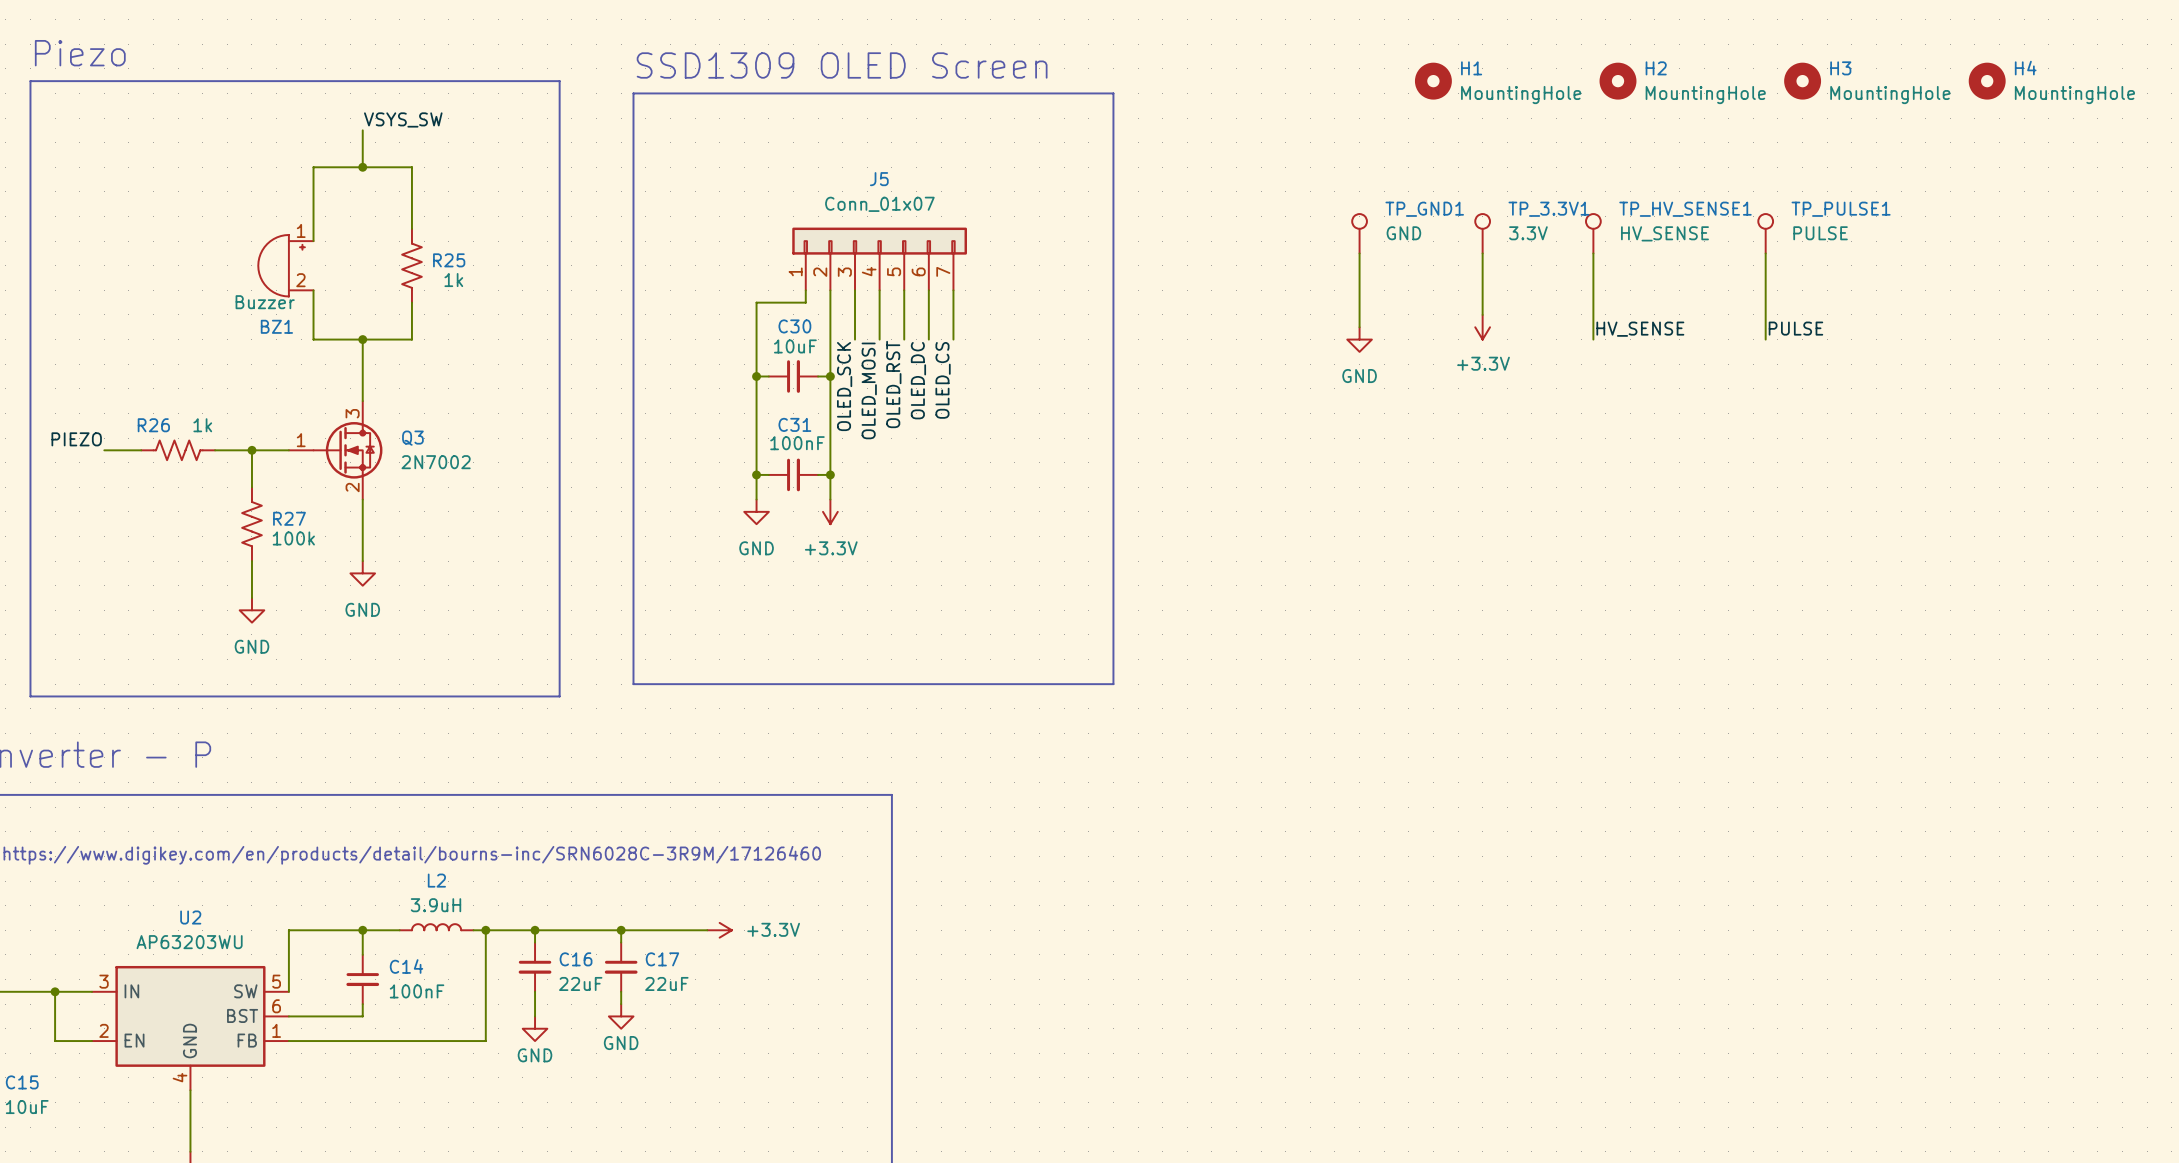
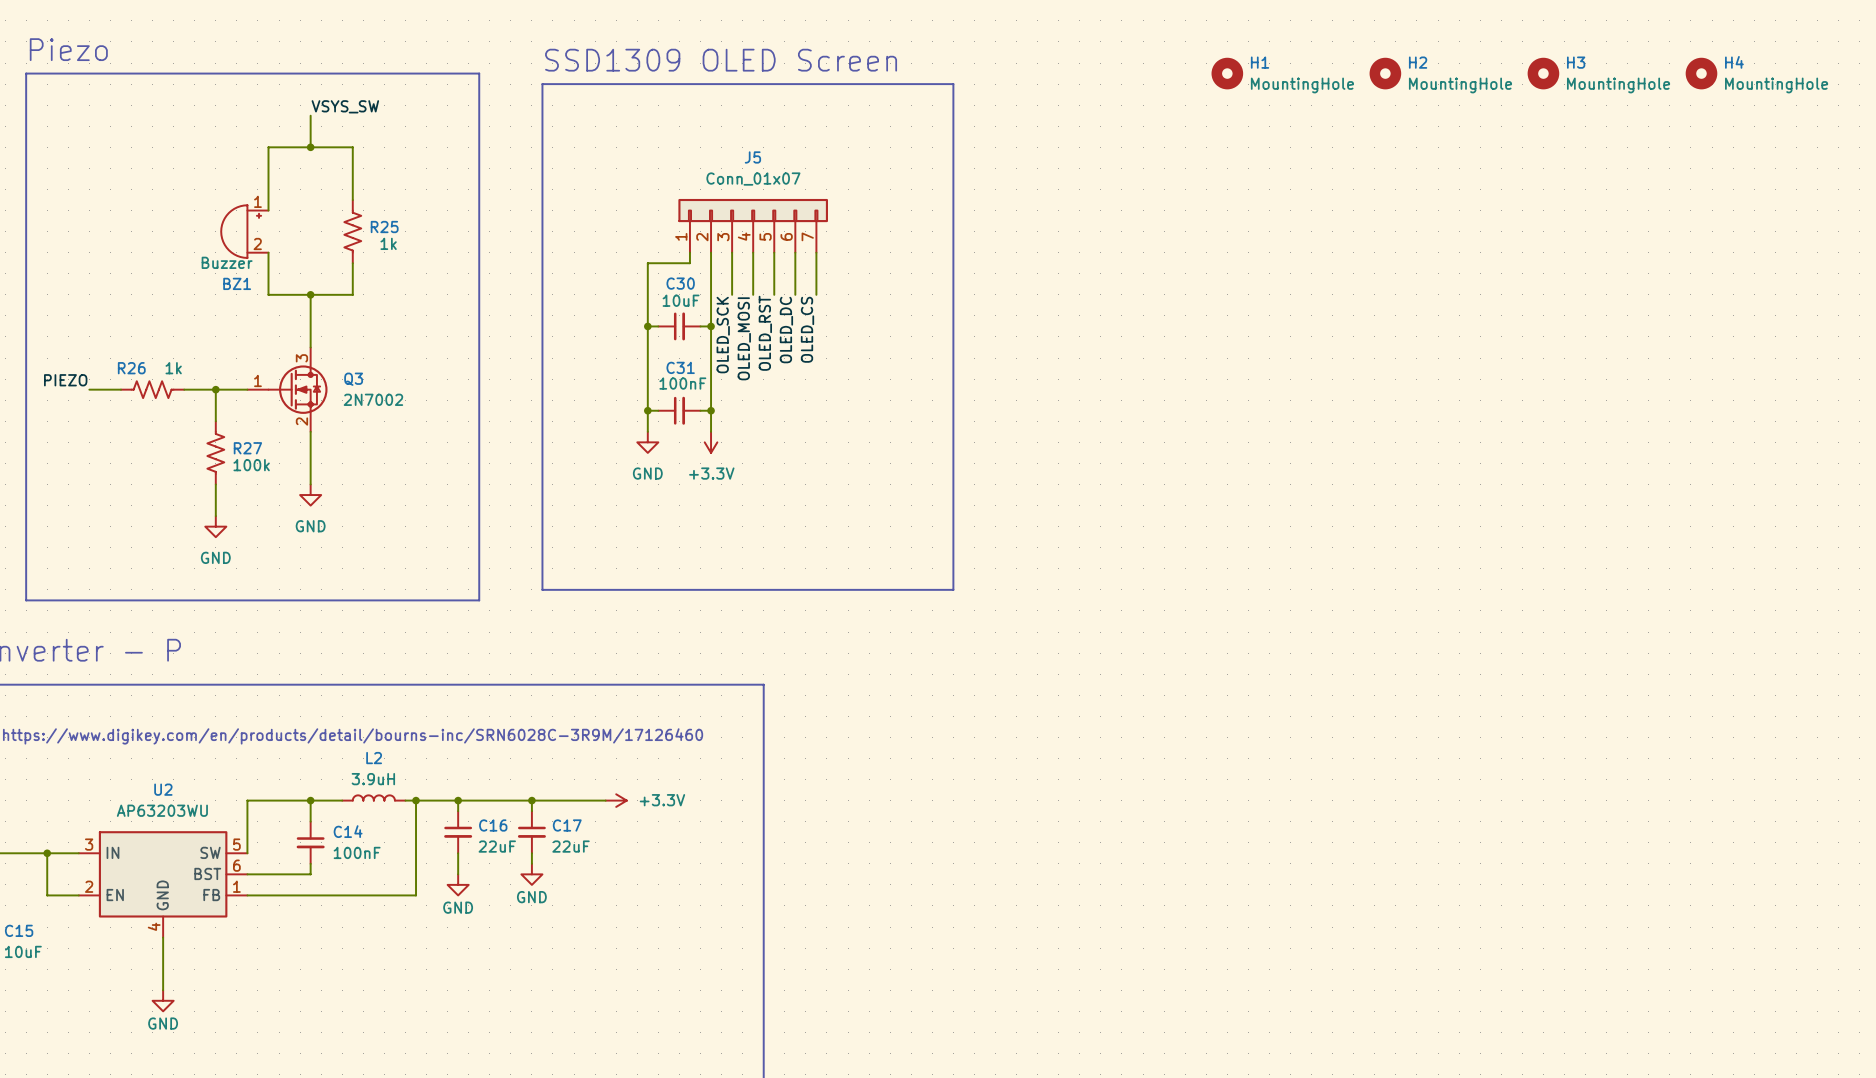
TP_GND1: GND (1359, 233) -> none
TP_3.3V1: 3.3V (1482, 233) -> none
TP_HV_SENSE1: HV_SENSE (1593, 233) -> none
TP_PULSE1: PULSE (1765, 233) -> none
wire: (1359, 253) (1359, 327) -> none
wire: (1482, 253) (1482, 314) -> none
wire: (1593, 253) (1593, 339) -> none
wire: (1765, 253) (1765, 339) -> none
power symbol: +3.3V (1482, 327) -> none
label: PULSE (1795, 328) -> none
label: HV_SENSE (1640, 329) -> none
power symbol: GND (1359, 339) -> none

